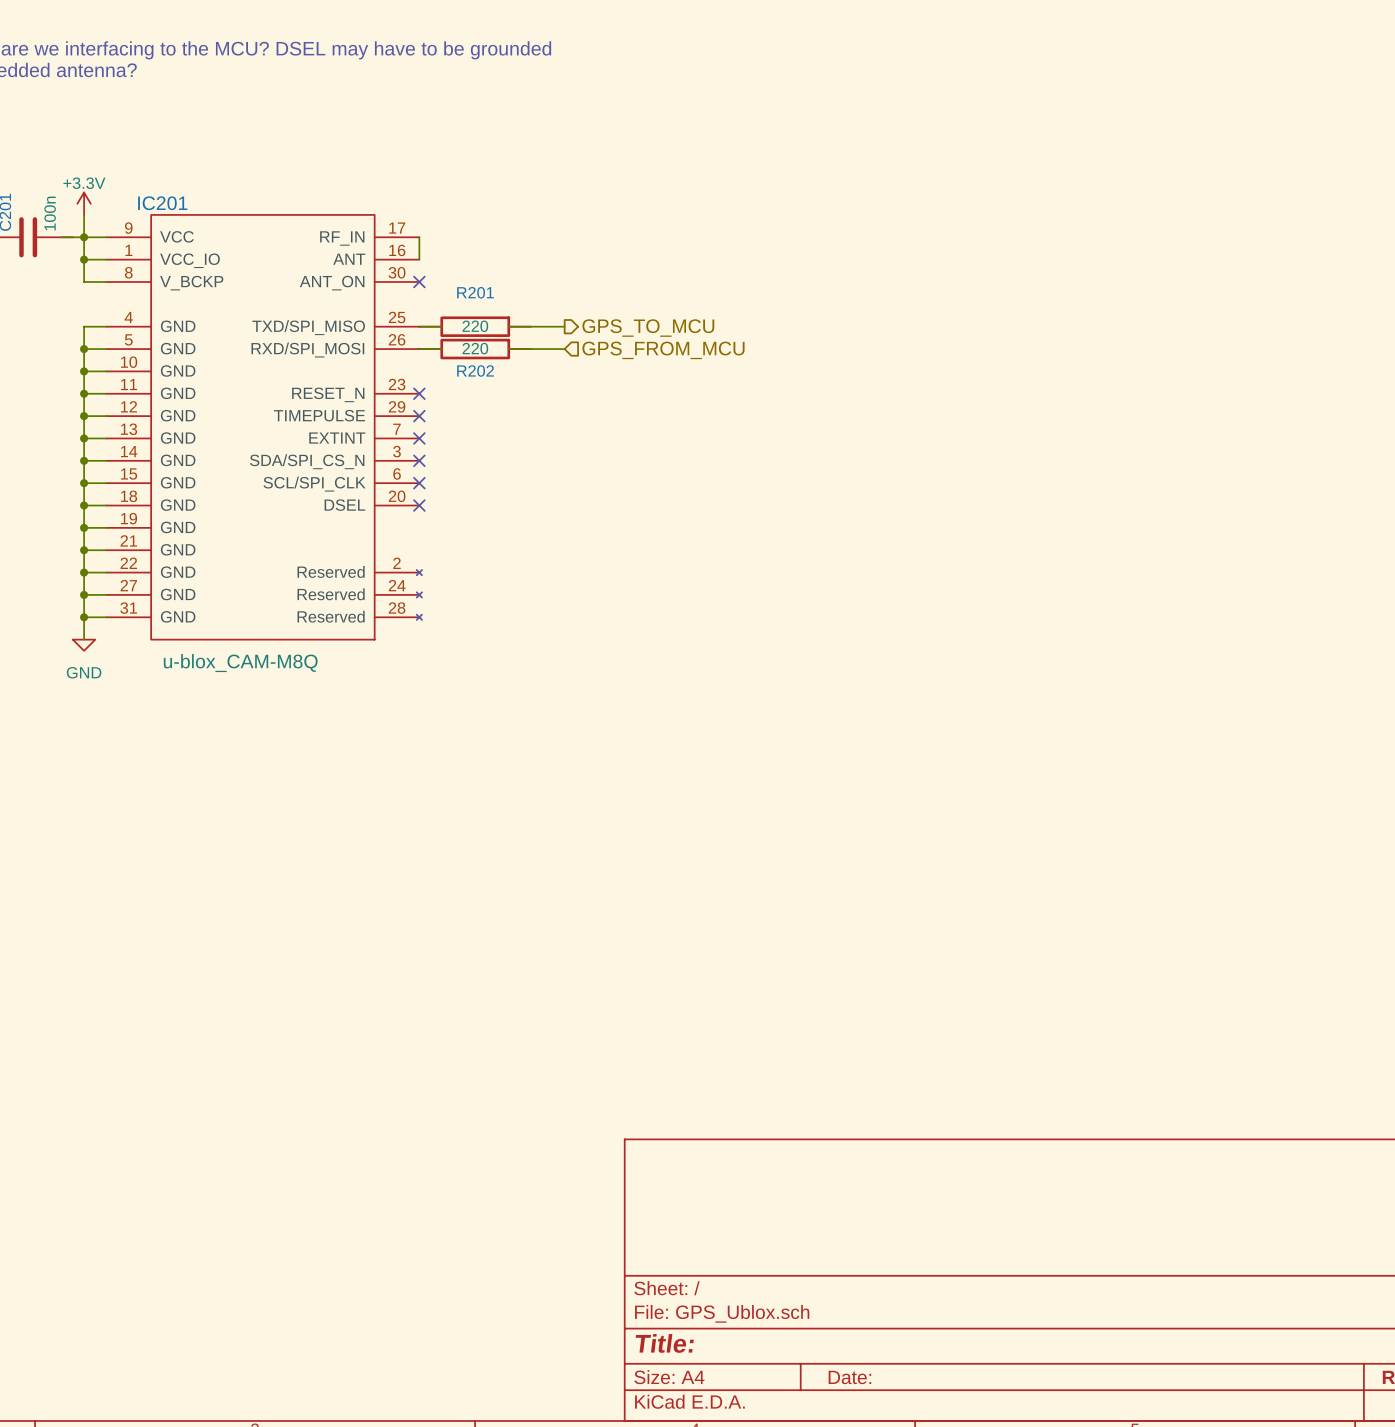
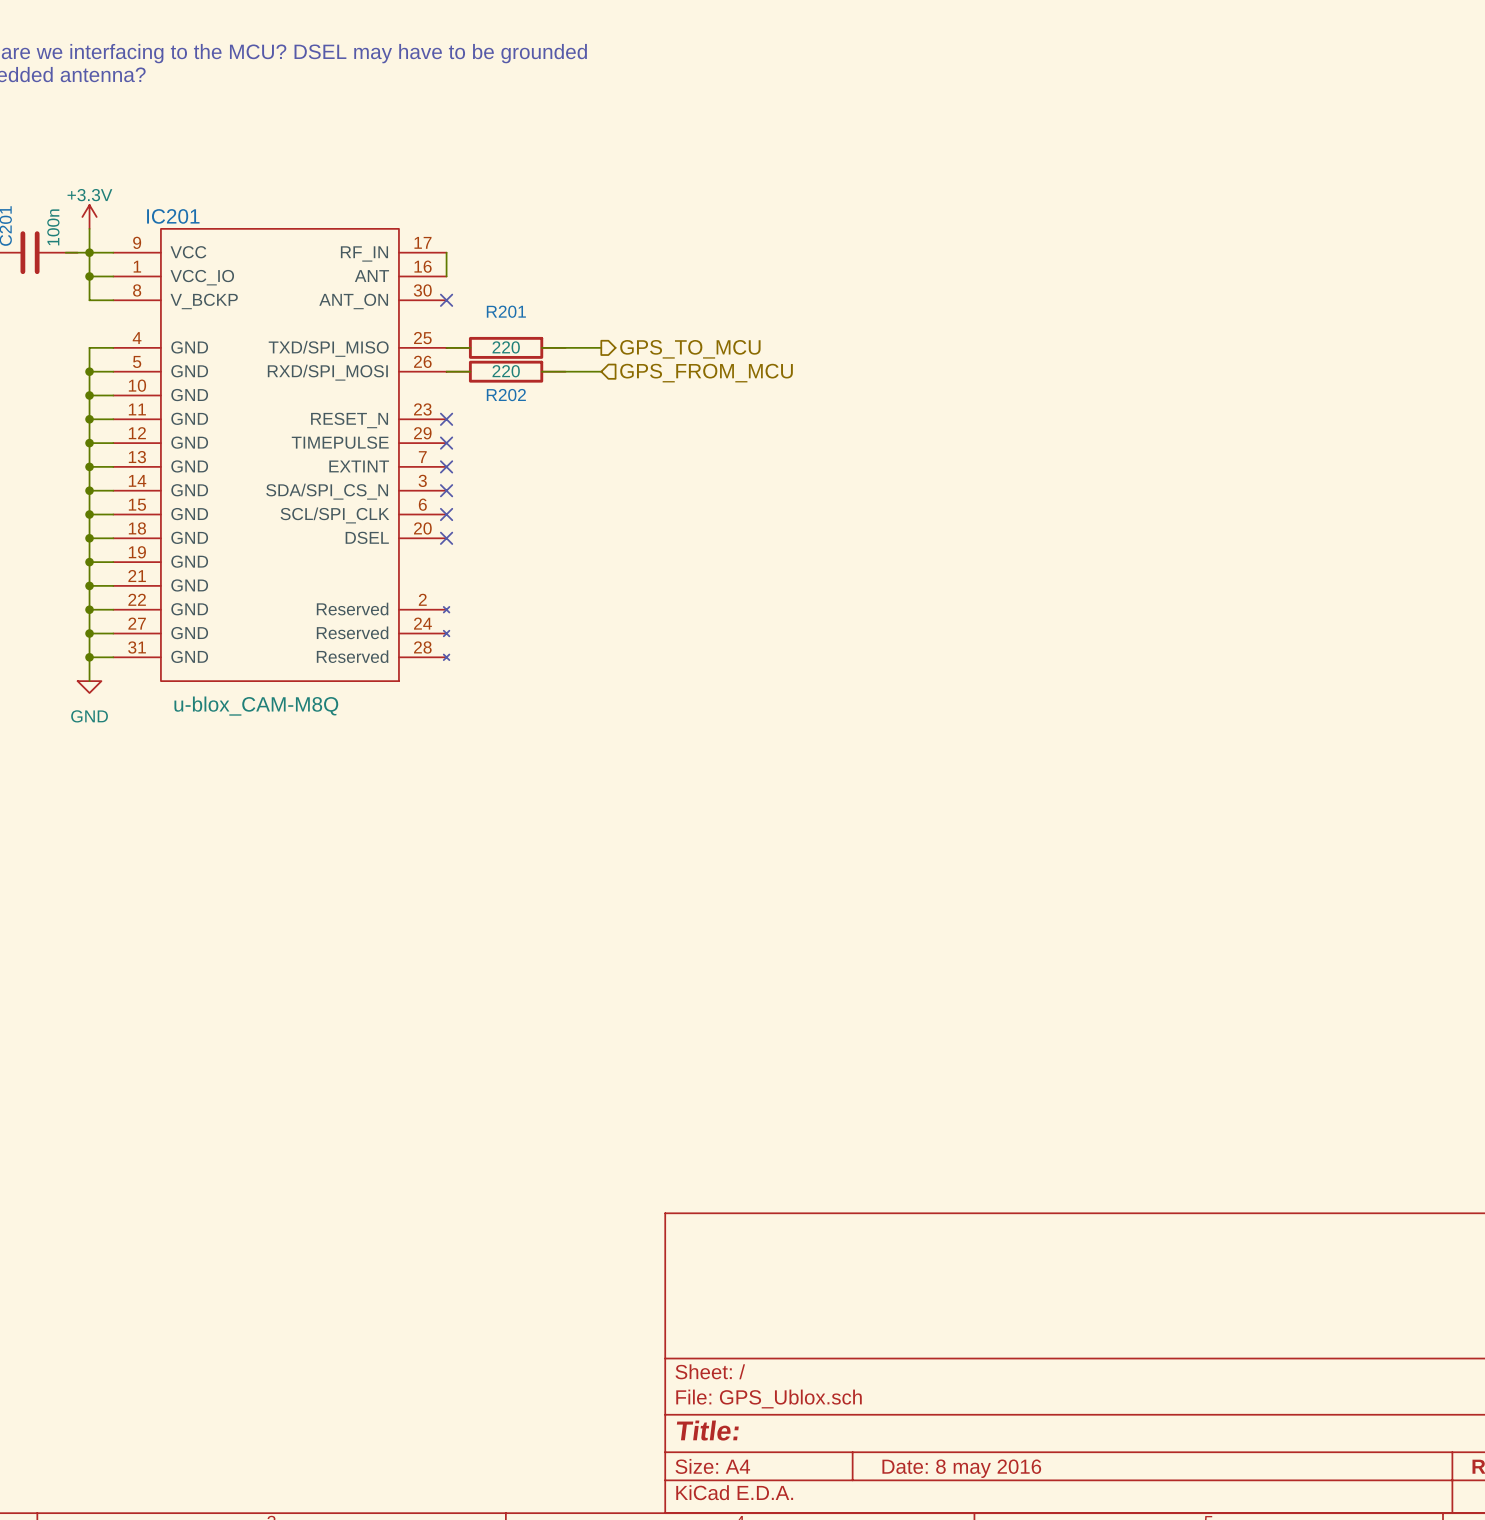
title block: Date: (849, 1377) -> Date: 8 may 2016 (961, 1468)

